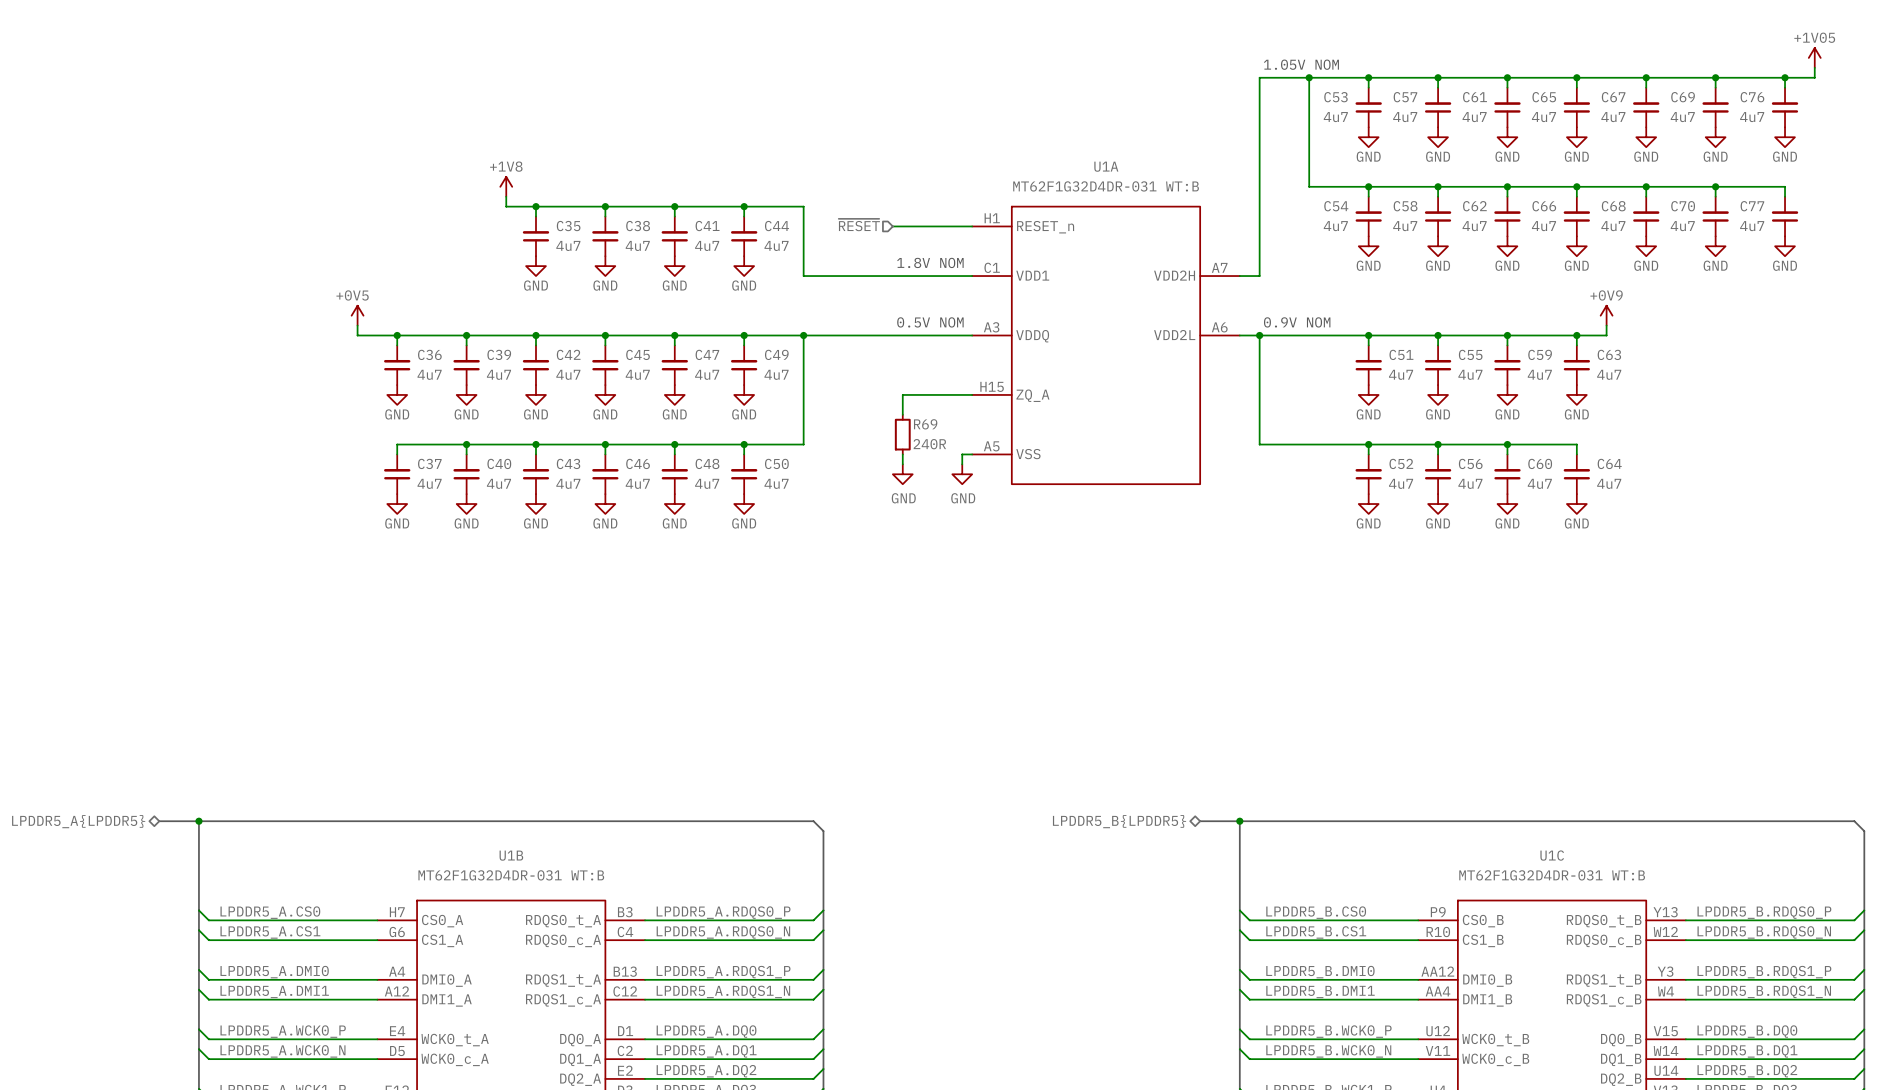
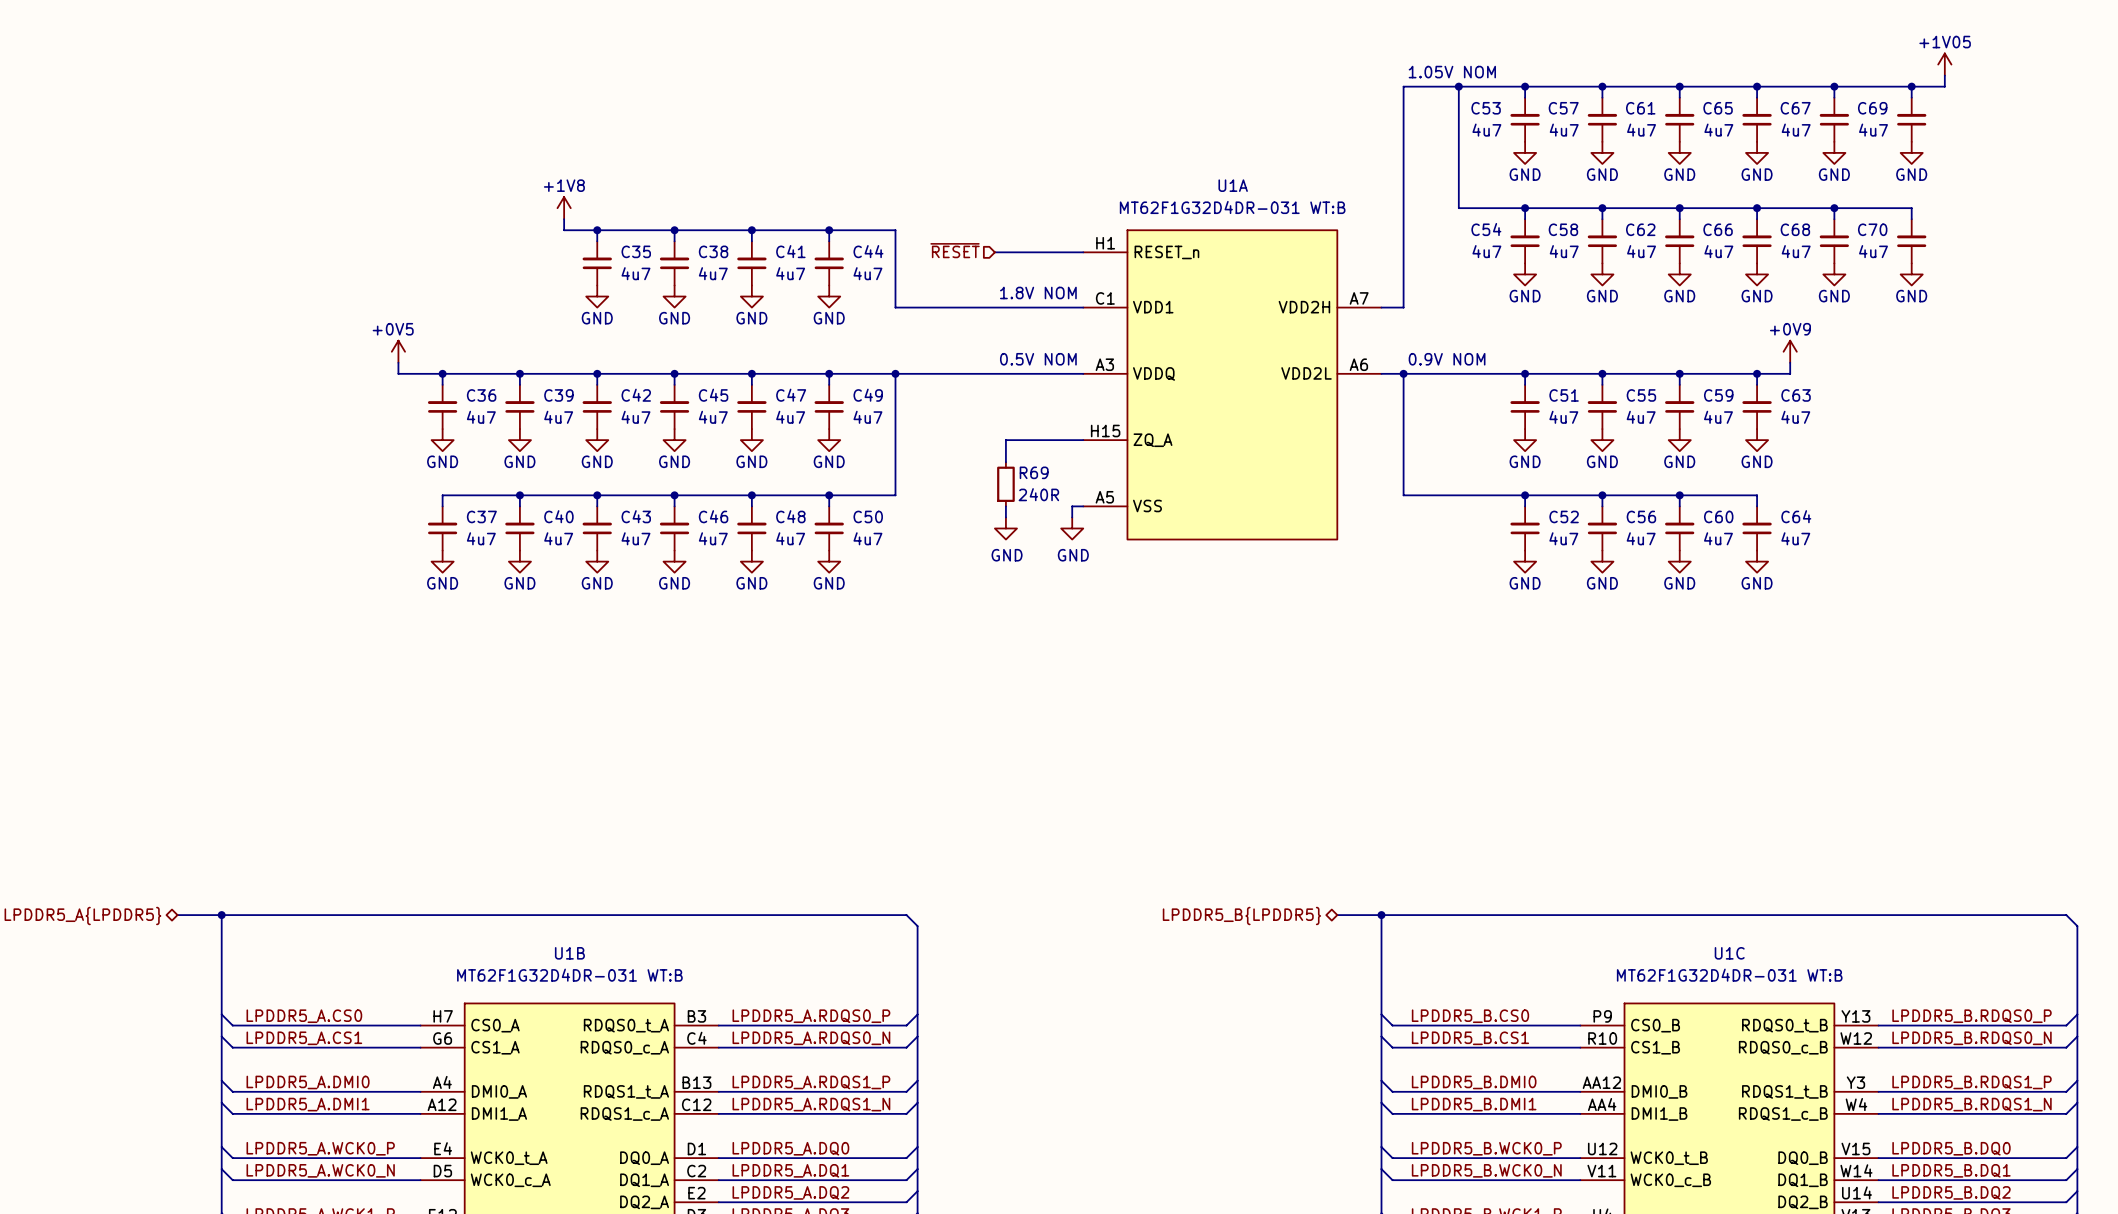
power symbol position: +1V05 (1814, 57) -> +1V05 (1944, 64)
wire: (1814, 67) (1814, 77) (1745, 77) -> (1944, 75) (1944, 86)
wire: (1785, 77) (1785, 87) -> none
junction: (1785, 77) -> none
C76: (1785, 107) -> none
power symbol: GND (1785, 137) -> none
wire: (1715, 186) (1785, 186) (1785, 196) -> none
junction: (1715, 186) -> none
C77: (1785, 216) -> none
power symbol: GND (1785, 246) -> none

